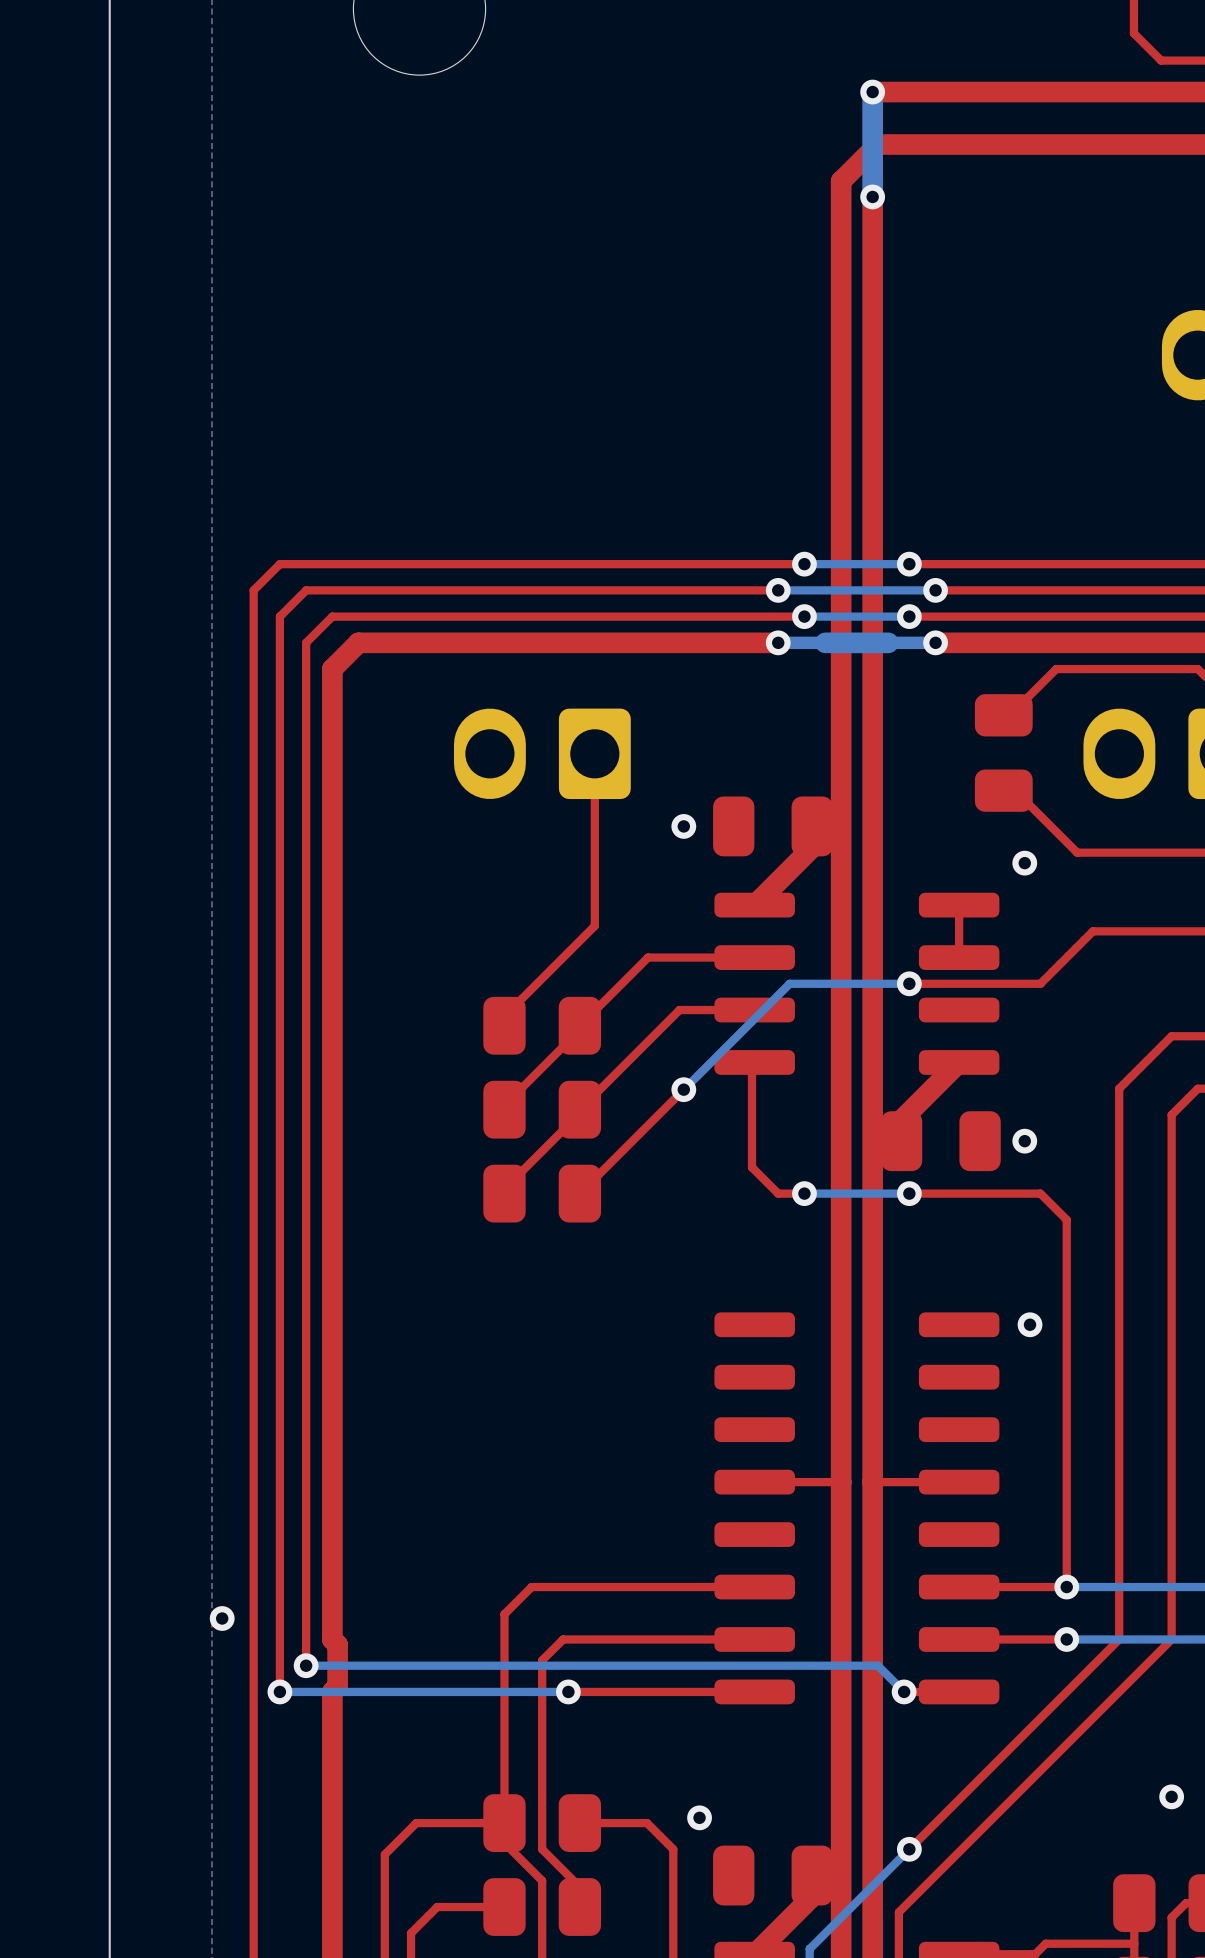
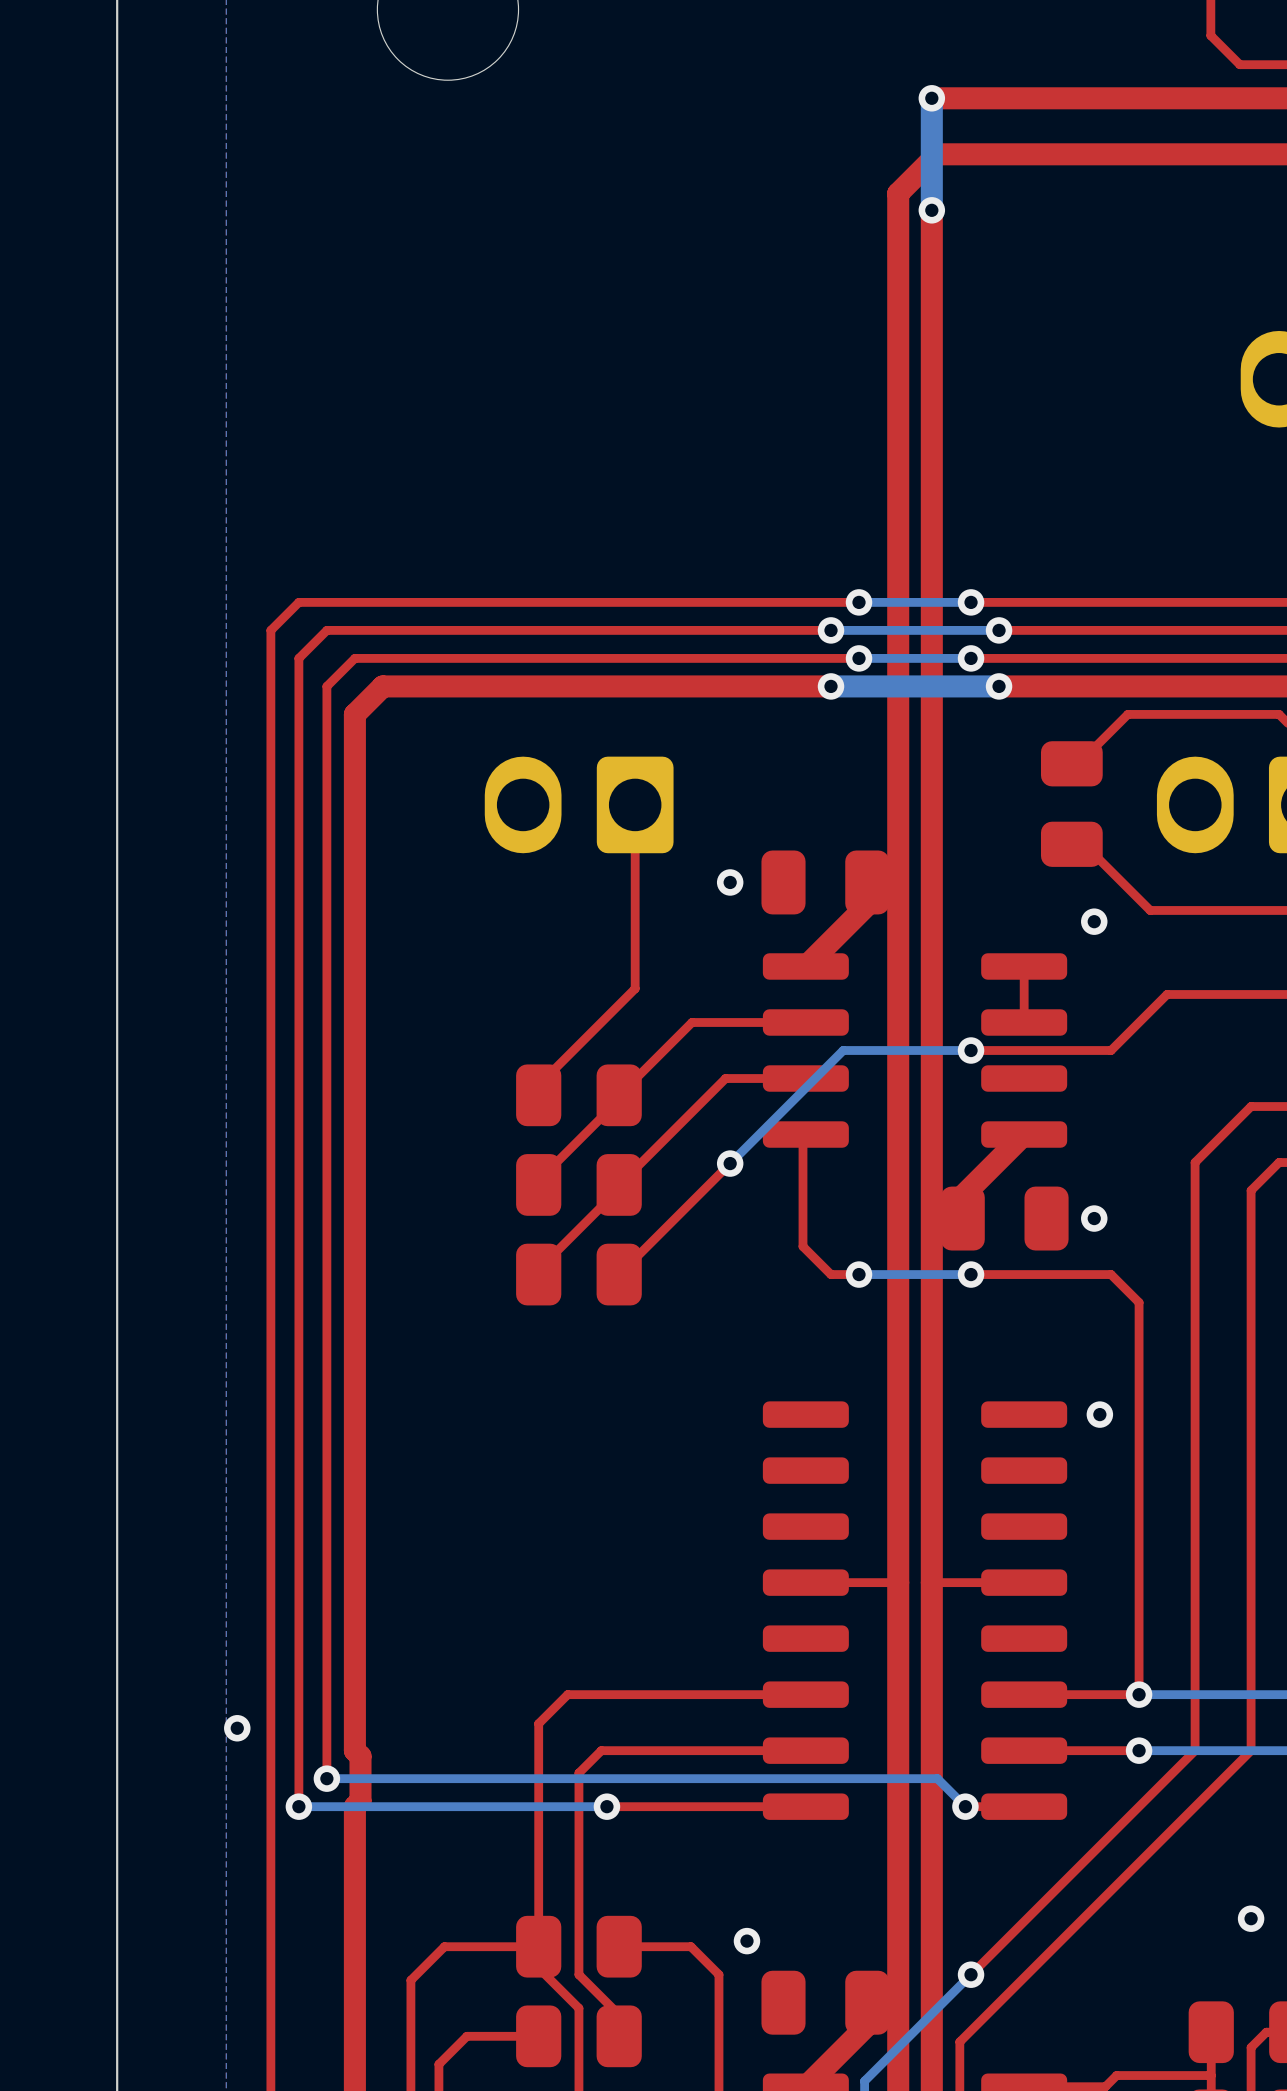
bottom track width: thin (825, 642) (778, 642) -> thick (881, 686) (831, 686)
bottom track width: thin (935, 642) (888, 642) -> thick (999, 686) (948, 686)

